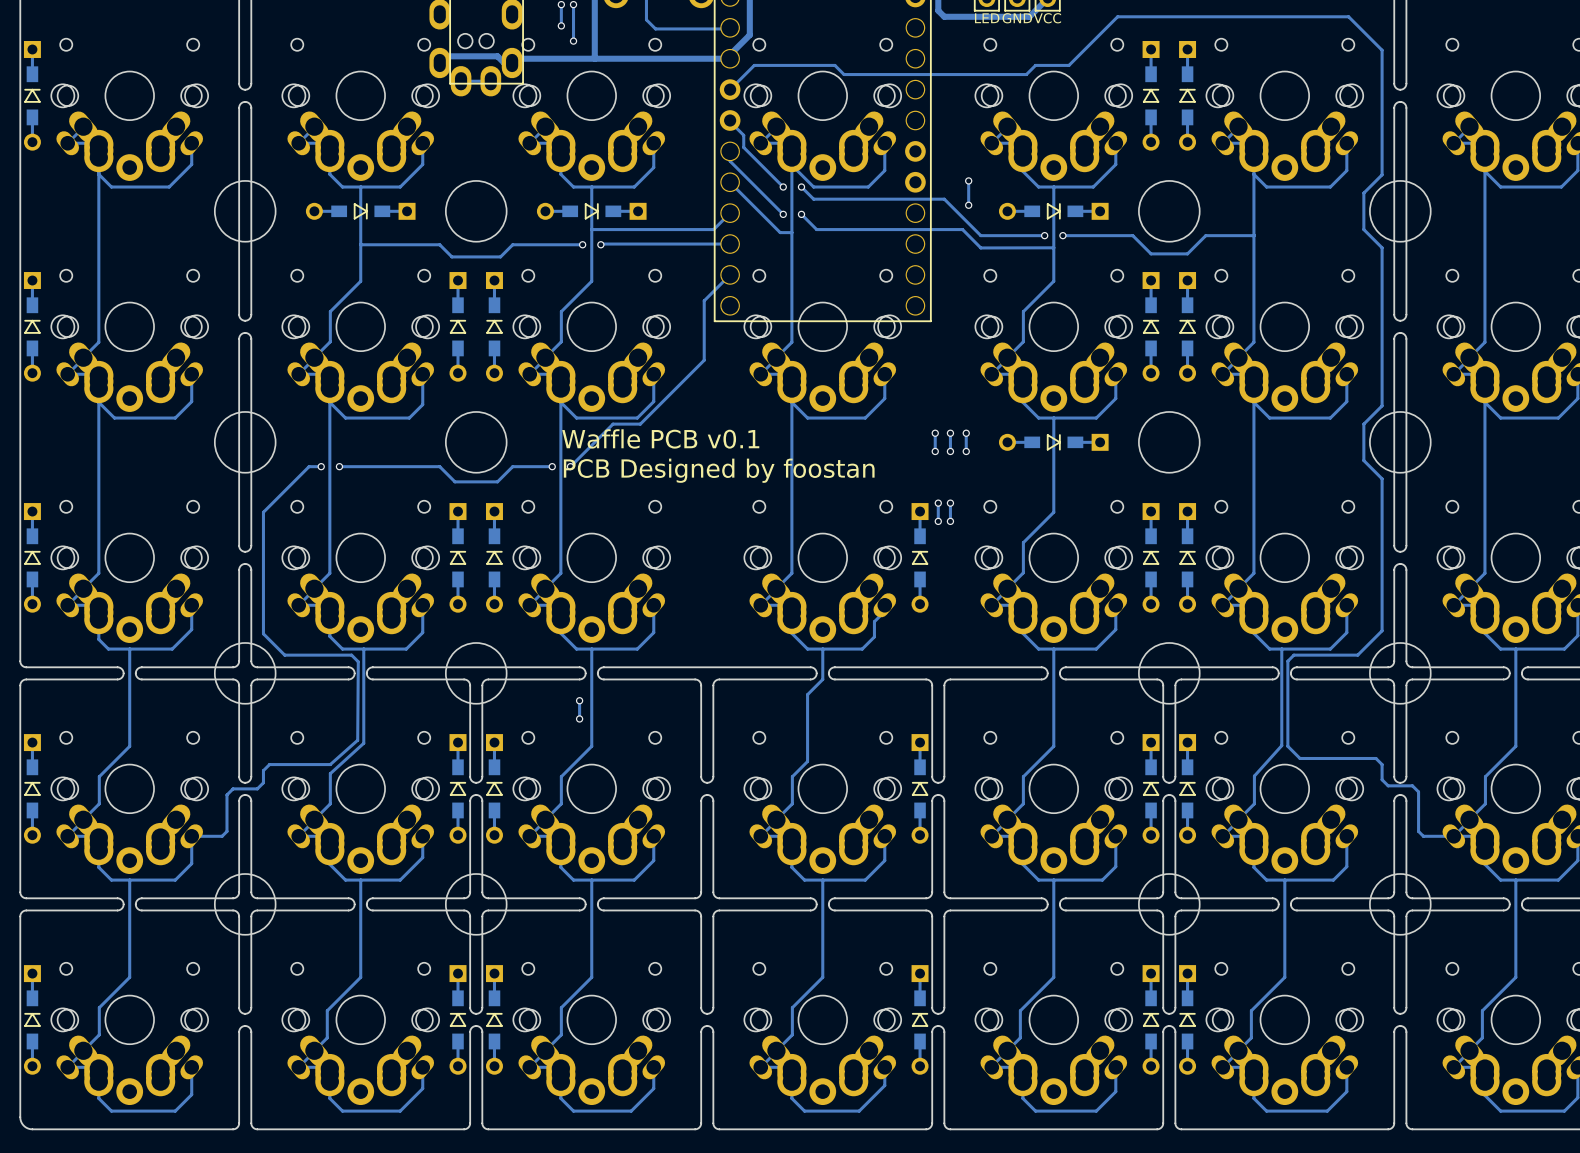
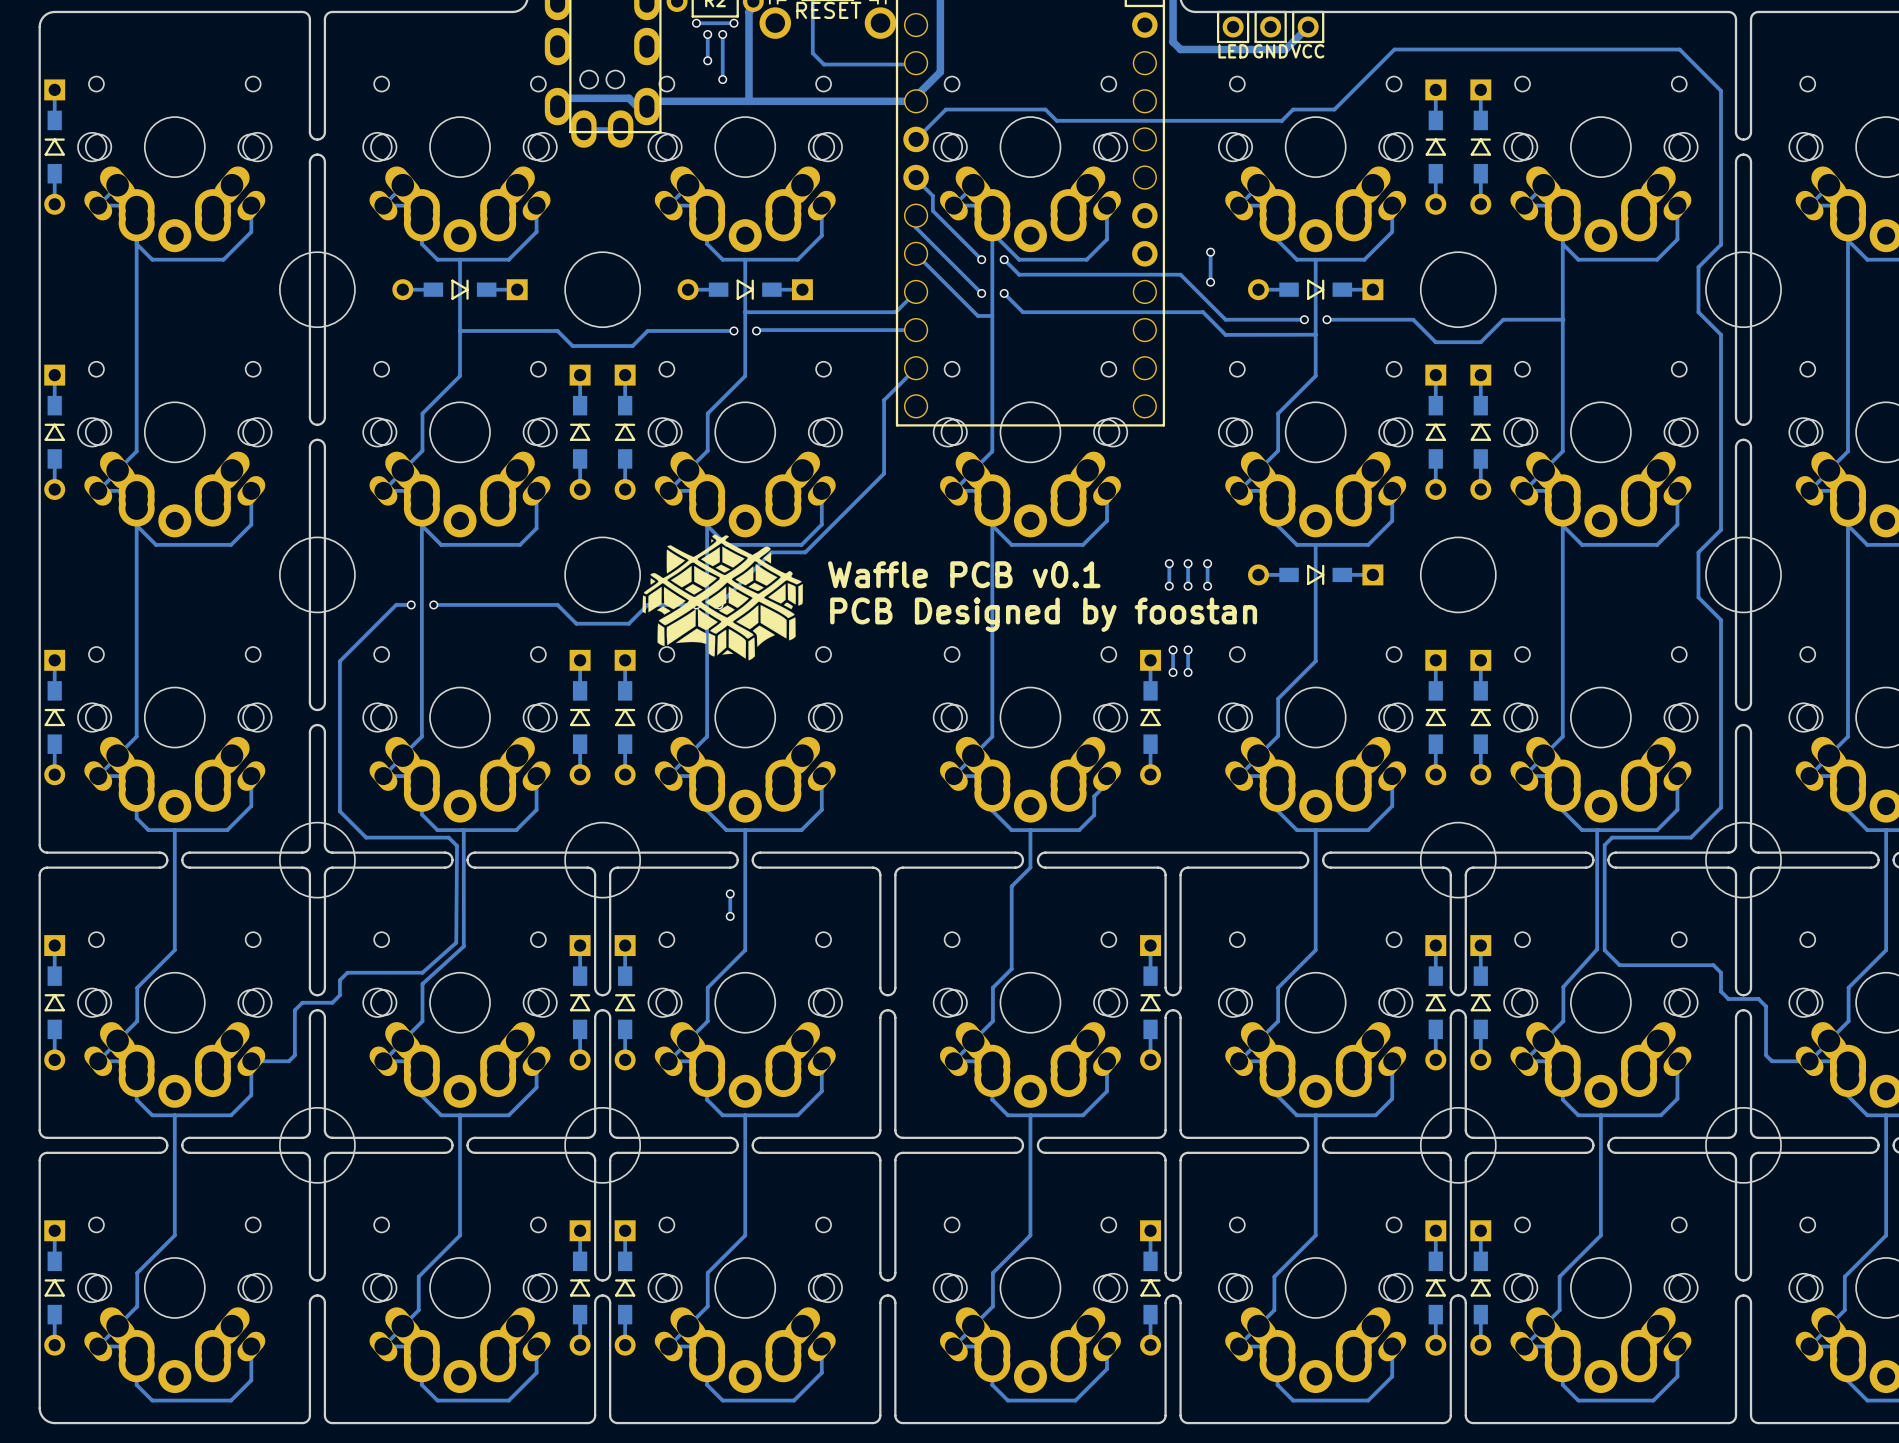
drawing: none -> [642, 534, 803, 661]
text position: Waffle PCB v0.1 (660, 438) -> Waffle PCB v0.1 (964, 574)
text position: PCB Designed by foostan (719, 470) -> PCB Designed by foostan (1043, 614)

